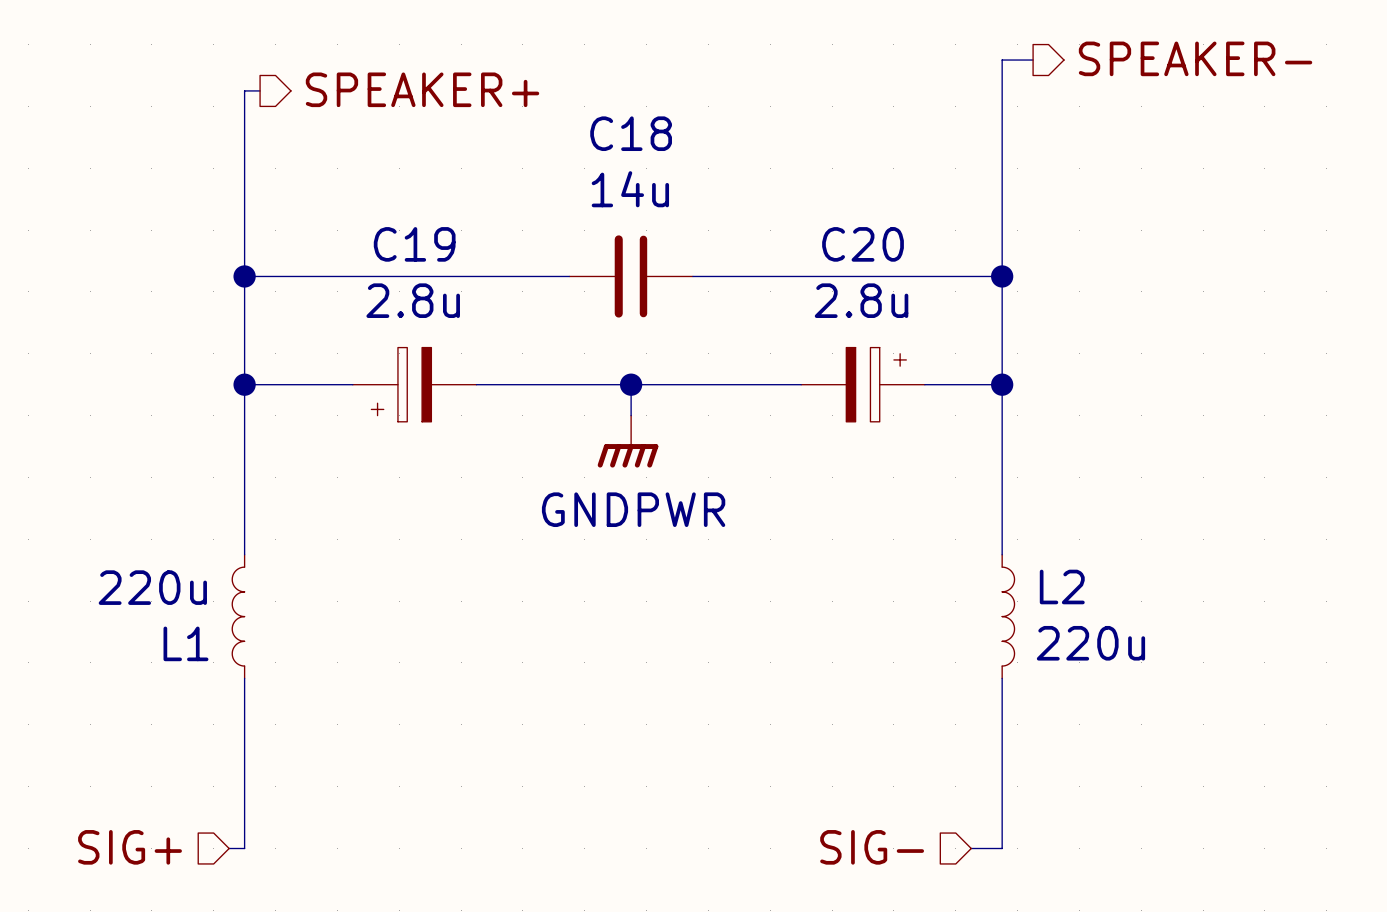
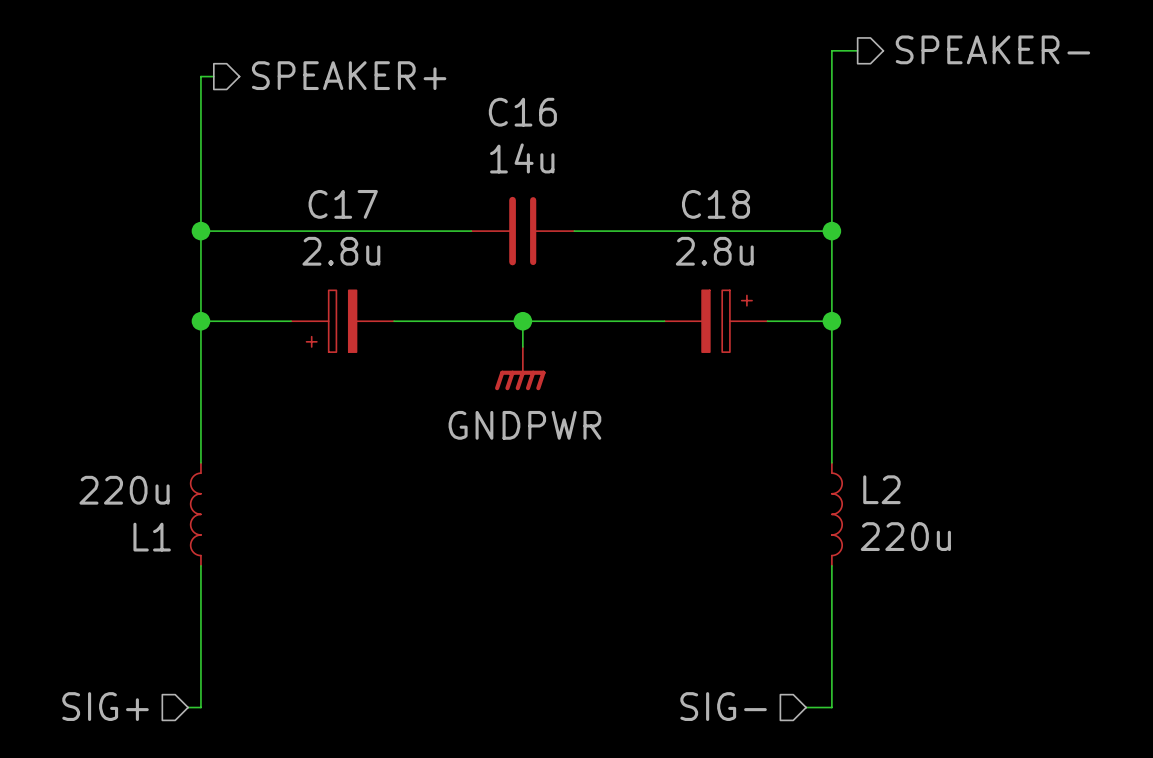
C18 name: C18 (631, 133) -> C16 (522, 112)
C19 name: C19 (414, 244) -> C17 (343, 204)
C20 name: C20 (863, 244) -> C18 (716, 204)

